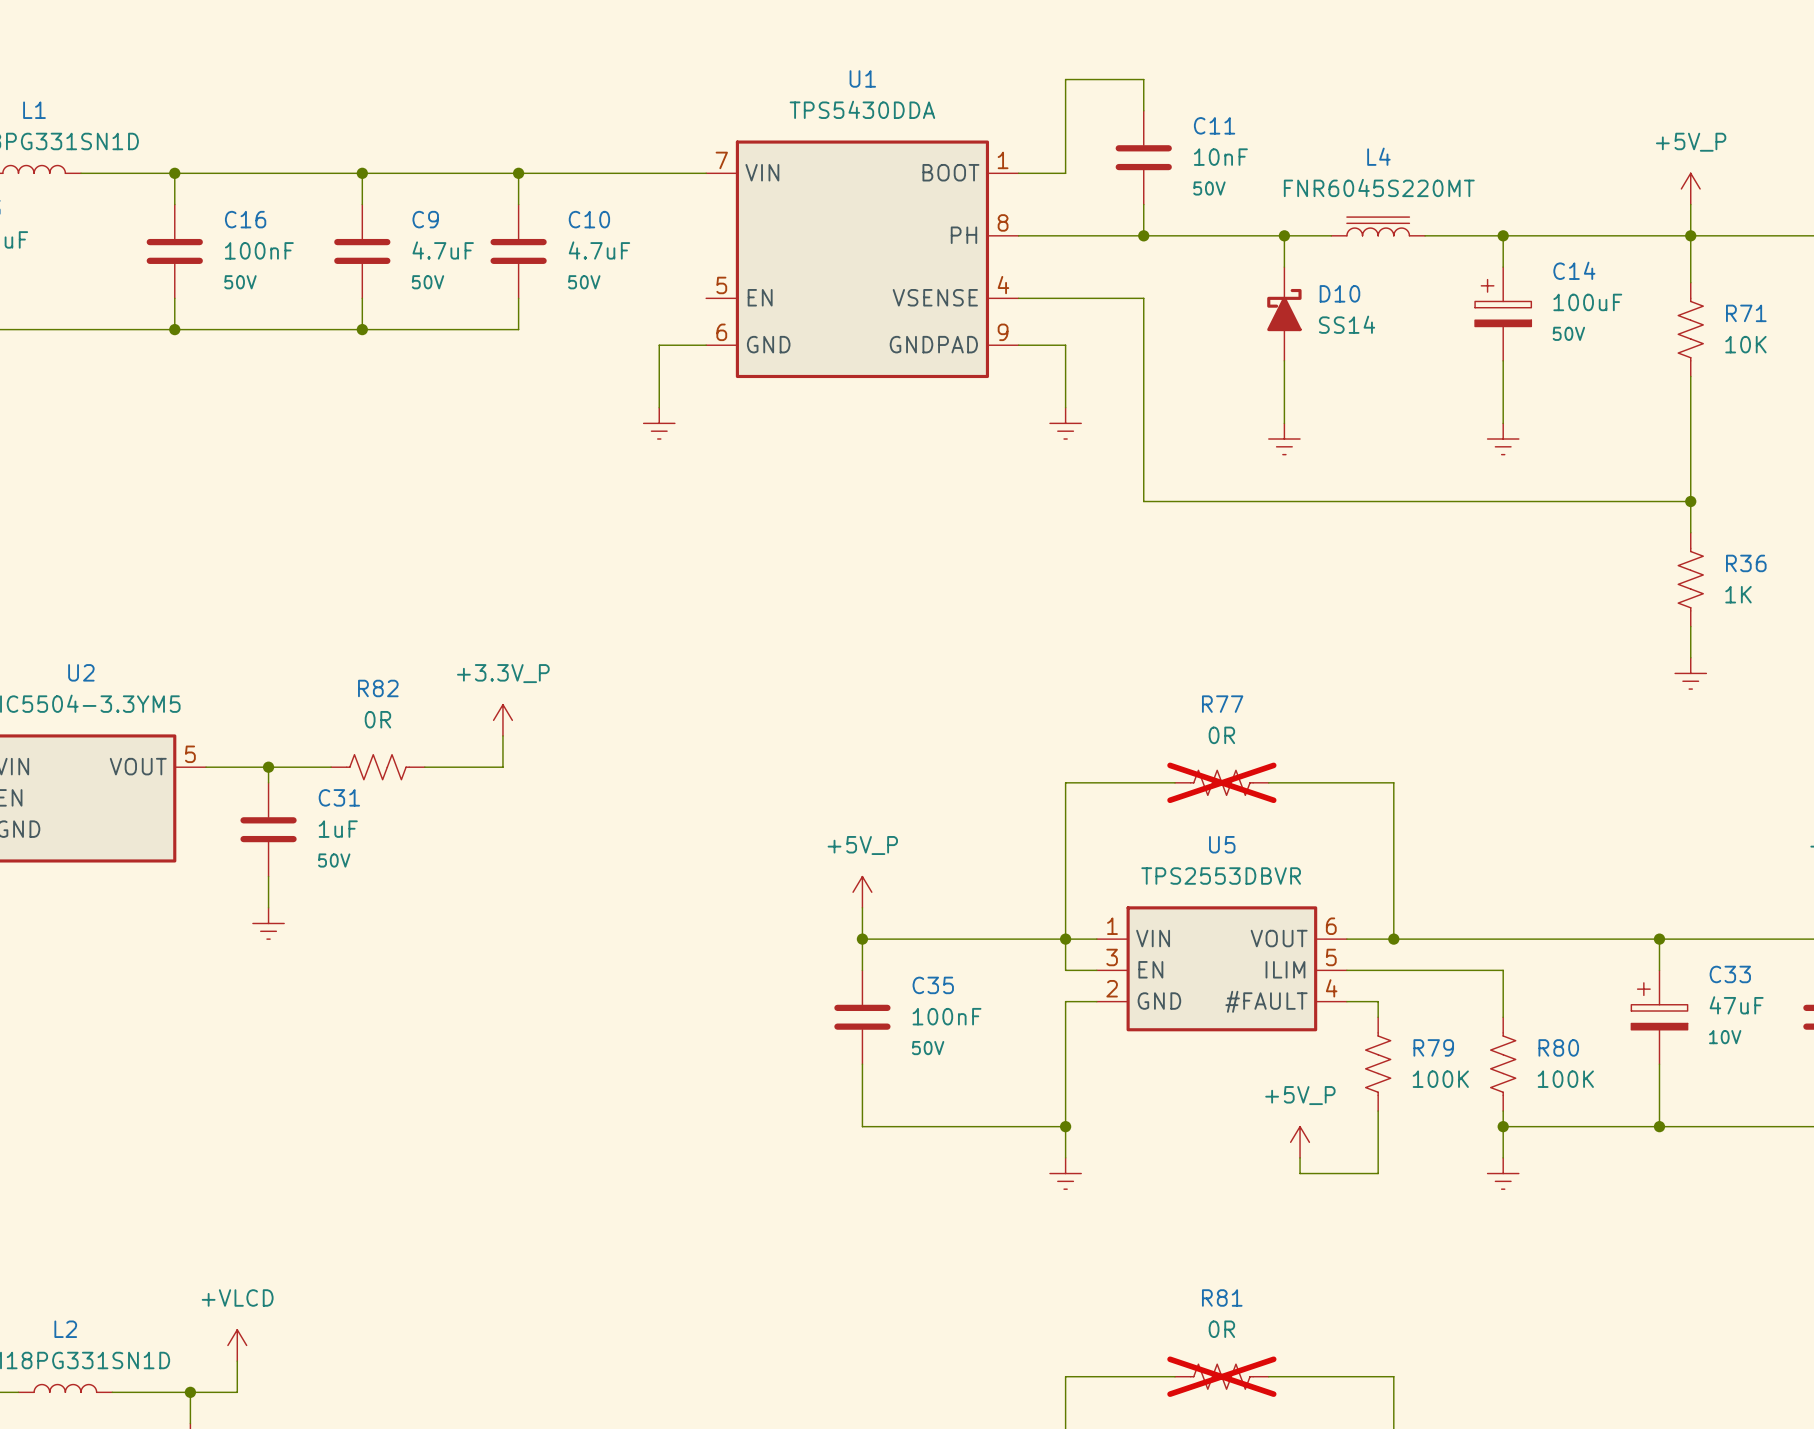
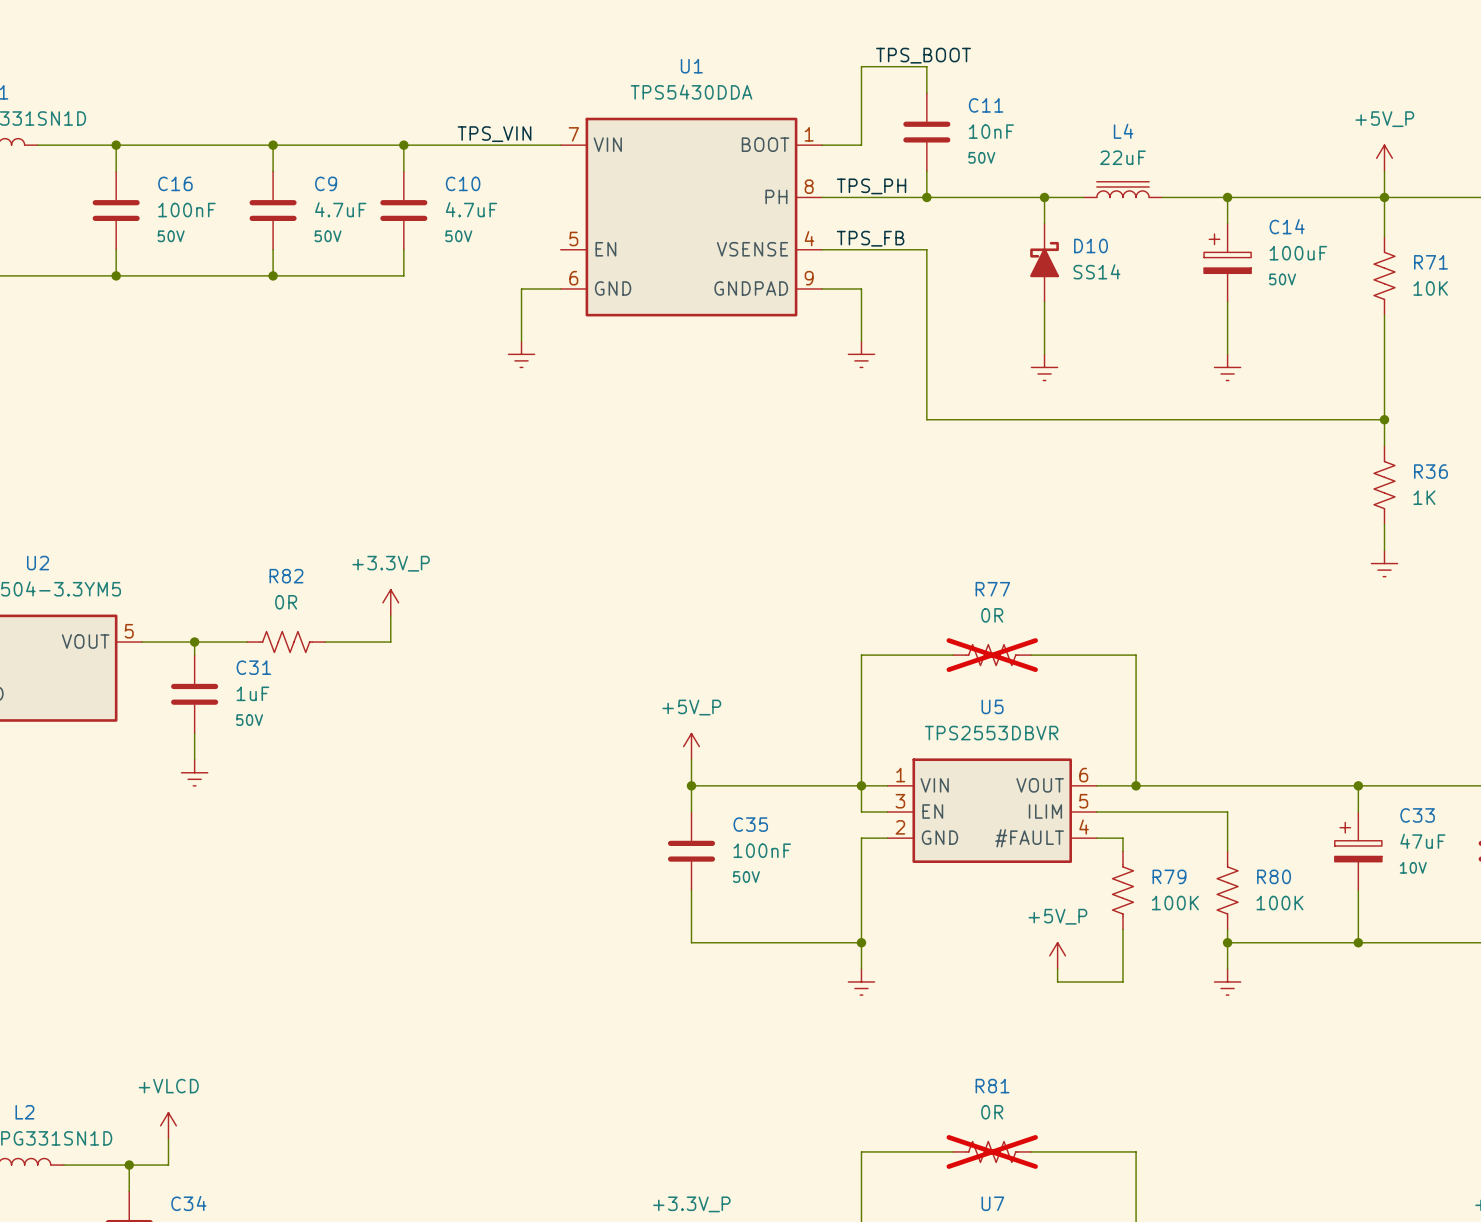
label: none -> TPS_BOOT (923, 55)
label: none -> TPS_VIN (494, 134)
L4 value: FNR6045S220MT (1379, 187) -> 22uF (1122, 157)
label: none -> TPS_PH (871, 186)
label: none -> TPS_FB (870, 238)

